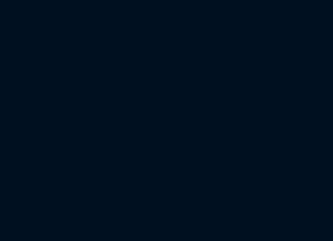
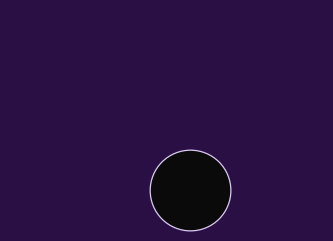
part: none -> (190, 190)

